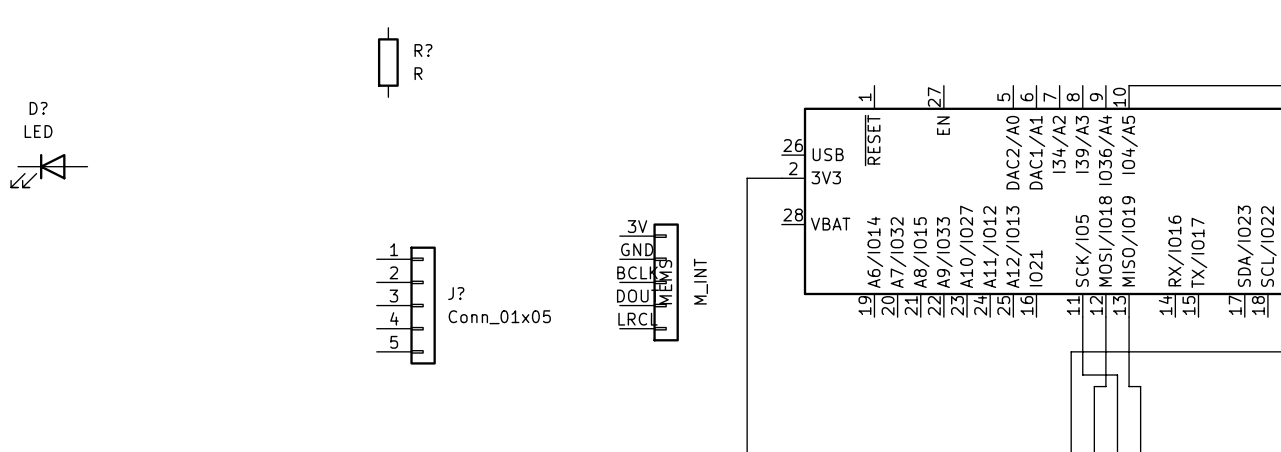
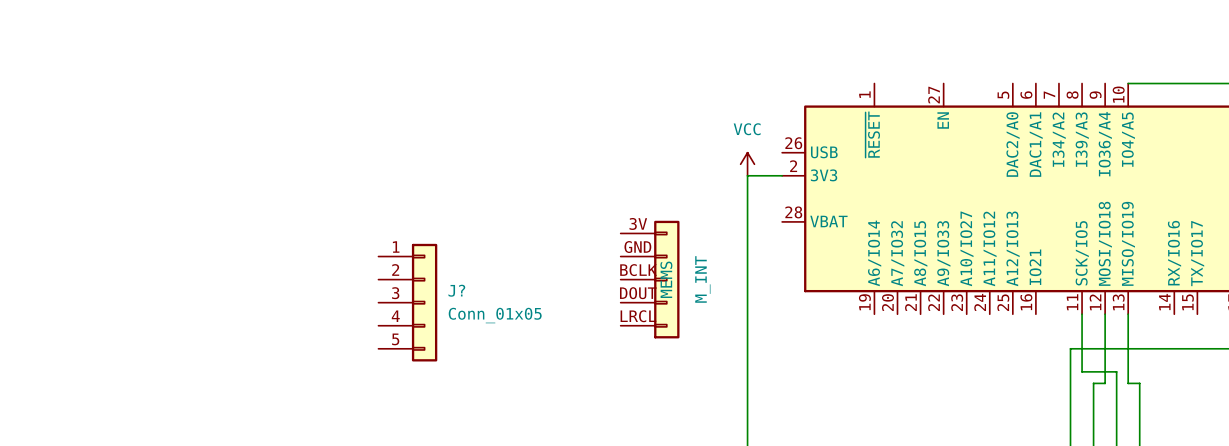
R?: R (388, 62) -> none
power symbol: none -> VCC (747, 164)
D?: LED (49, 170) -> none

